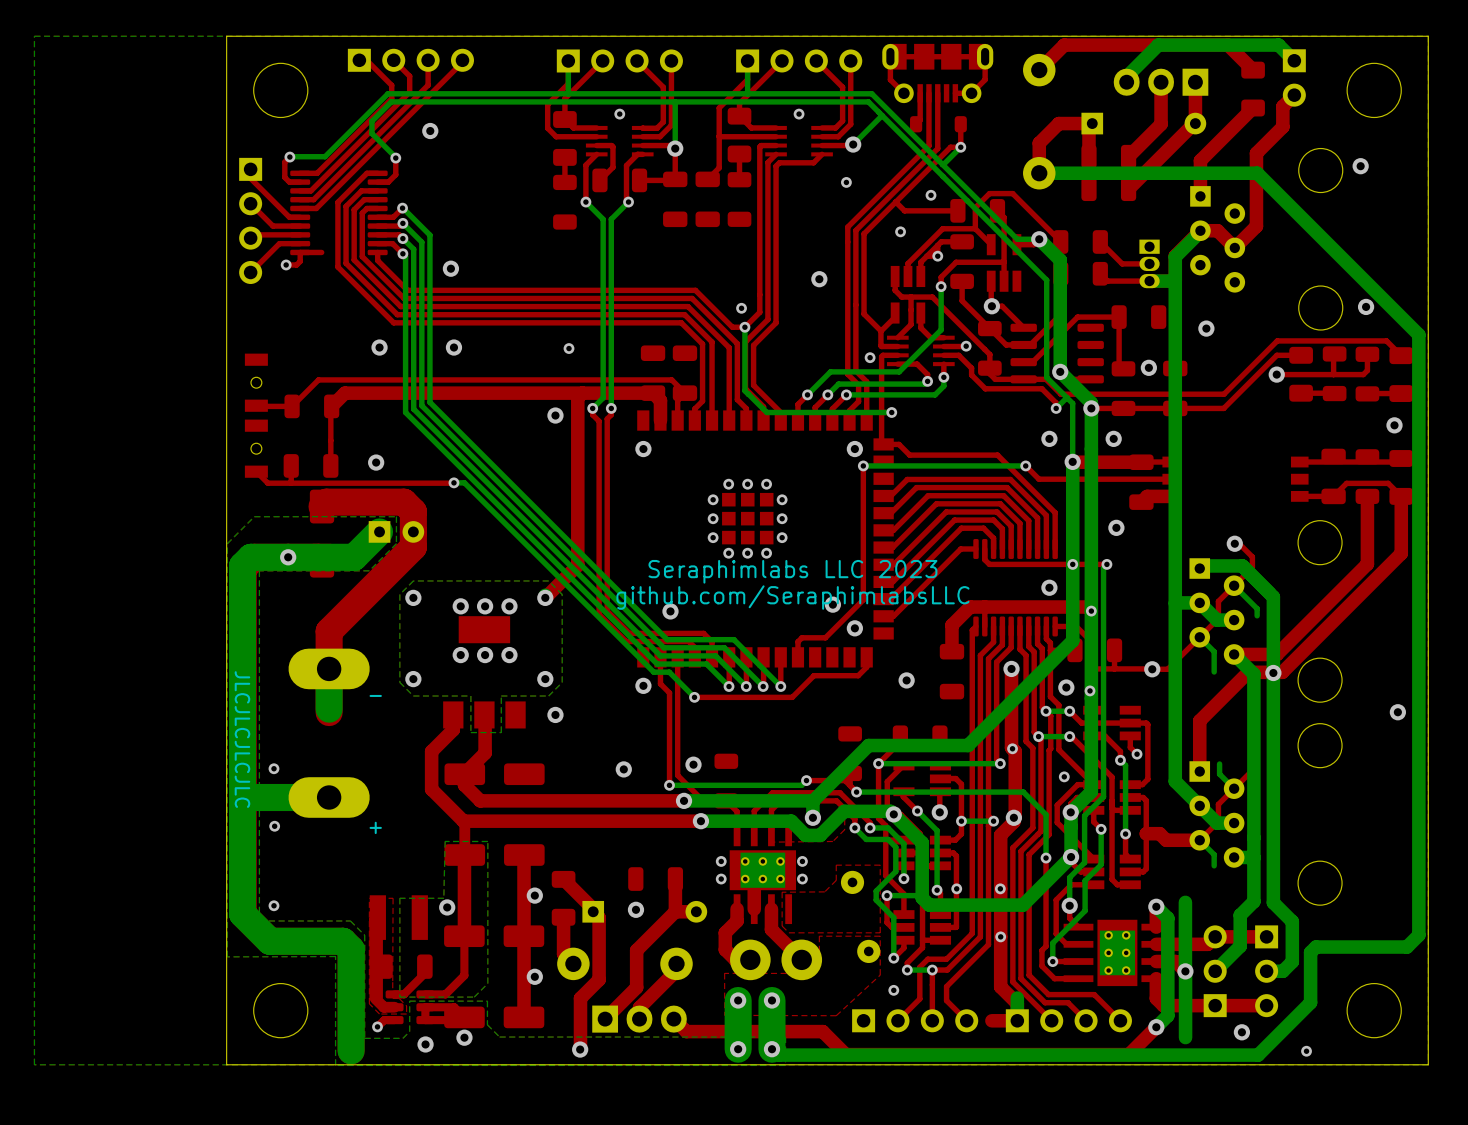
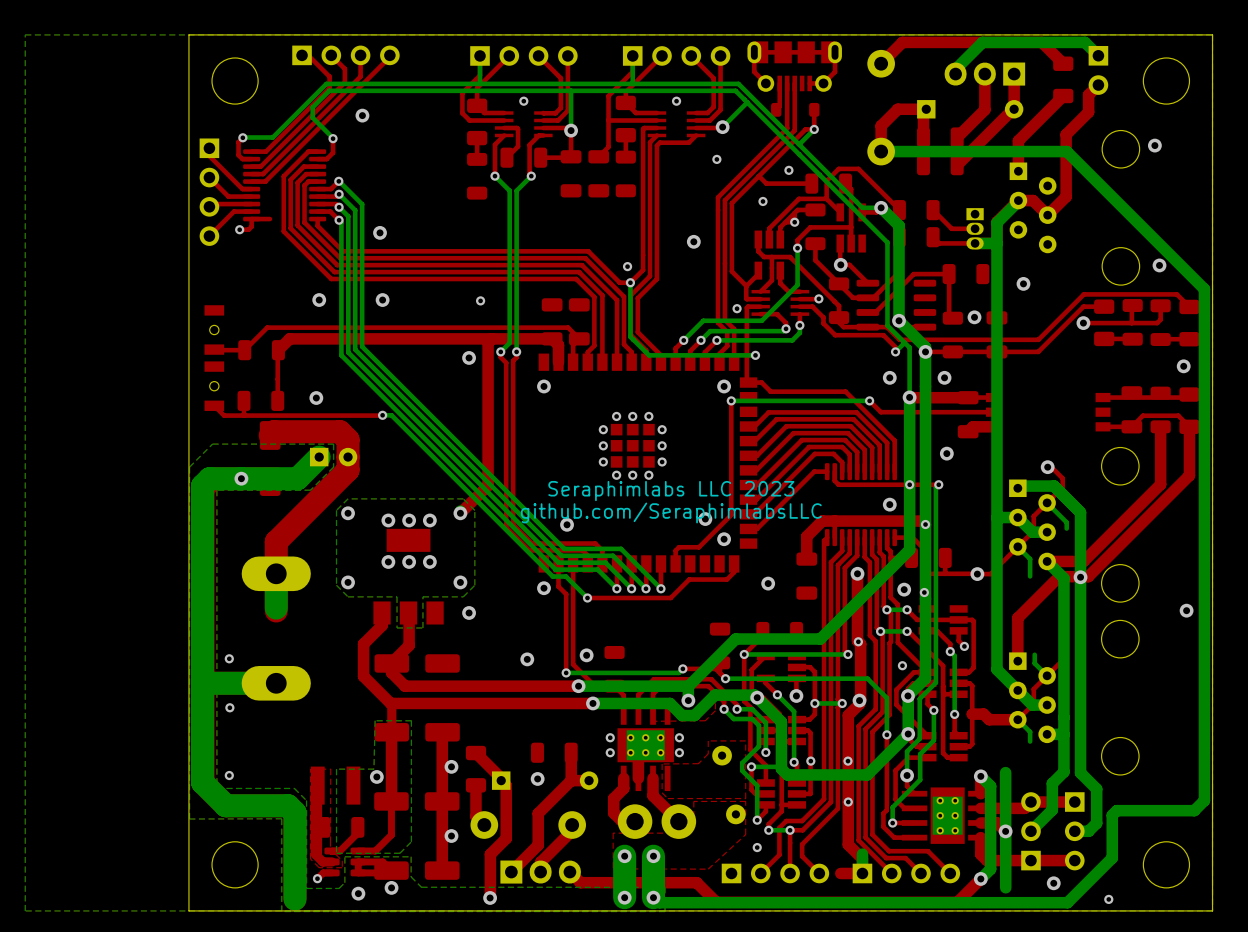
text: - (375, 695) -> none
text: JLCJLCJLCJLC (242, 739) -> none
text: + (375, 827) -> none

